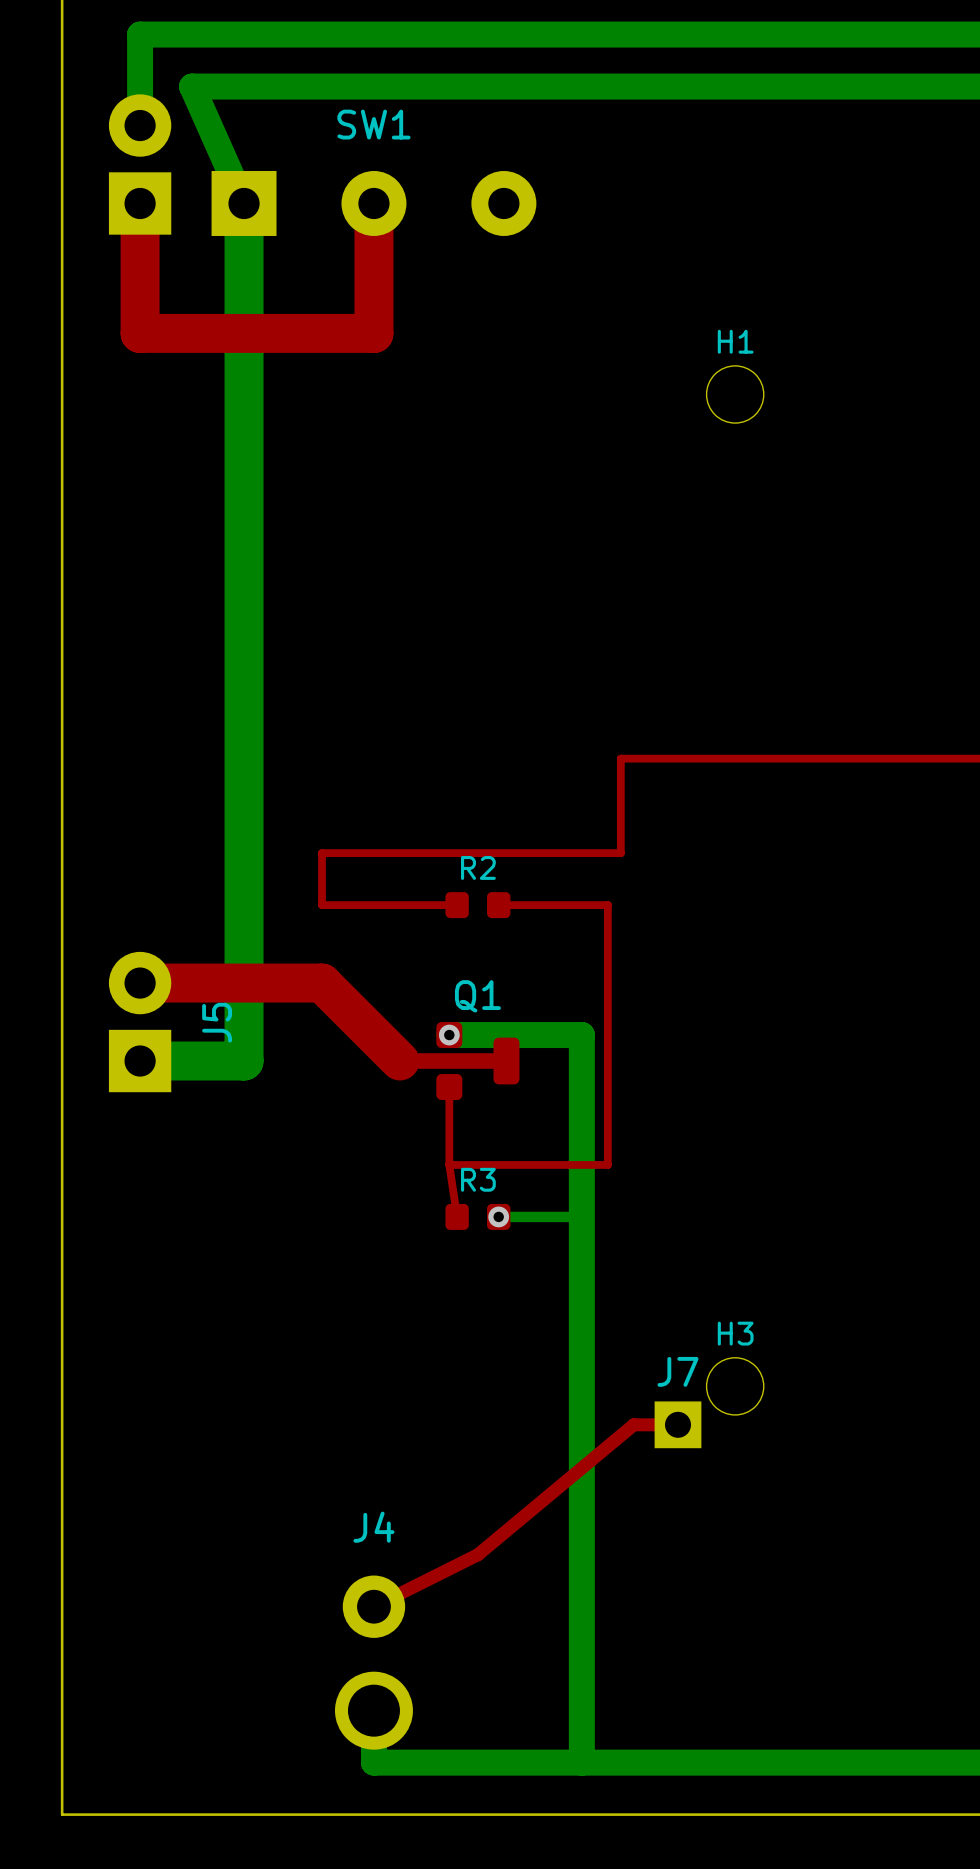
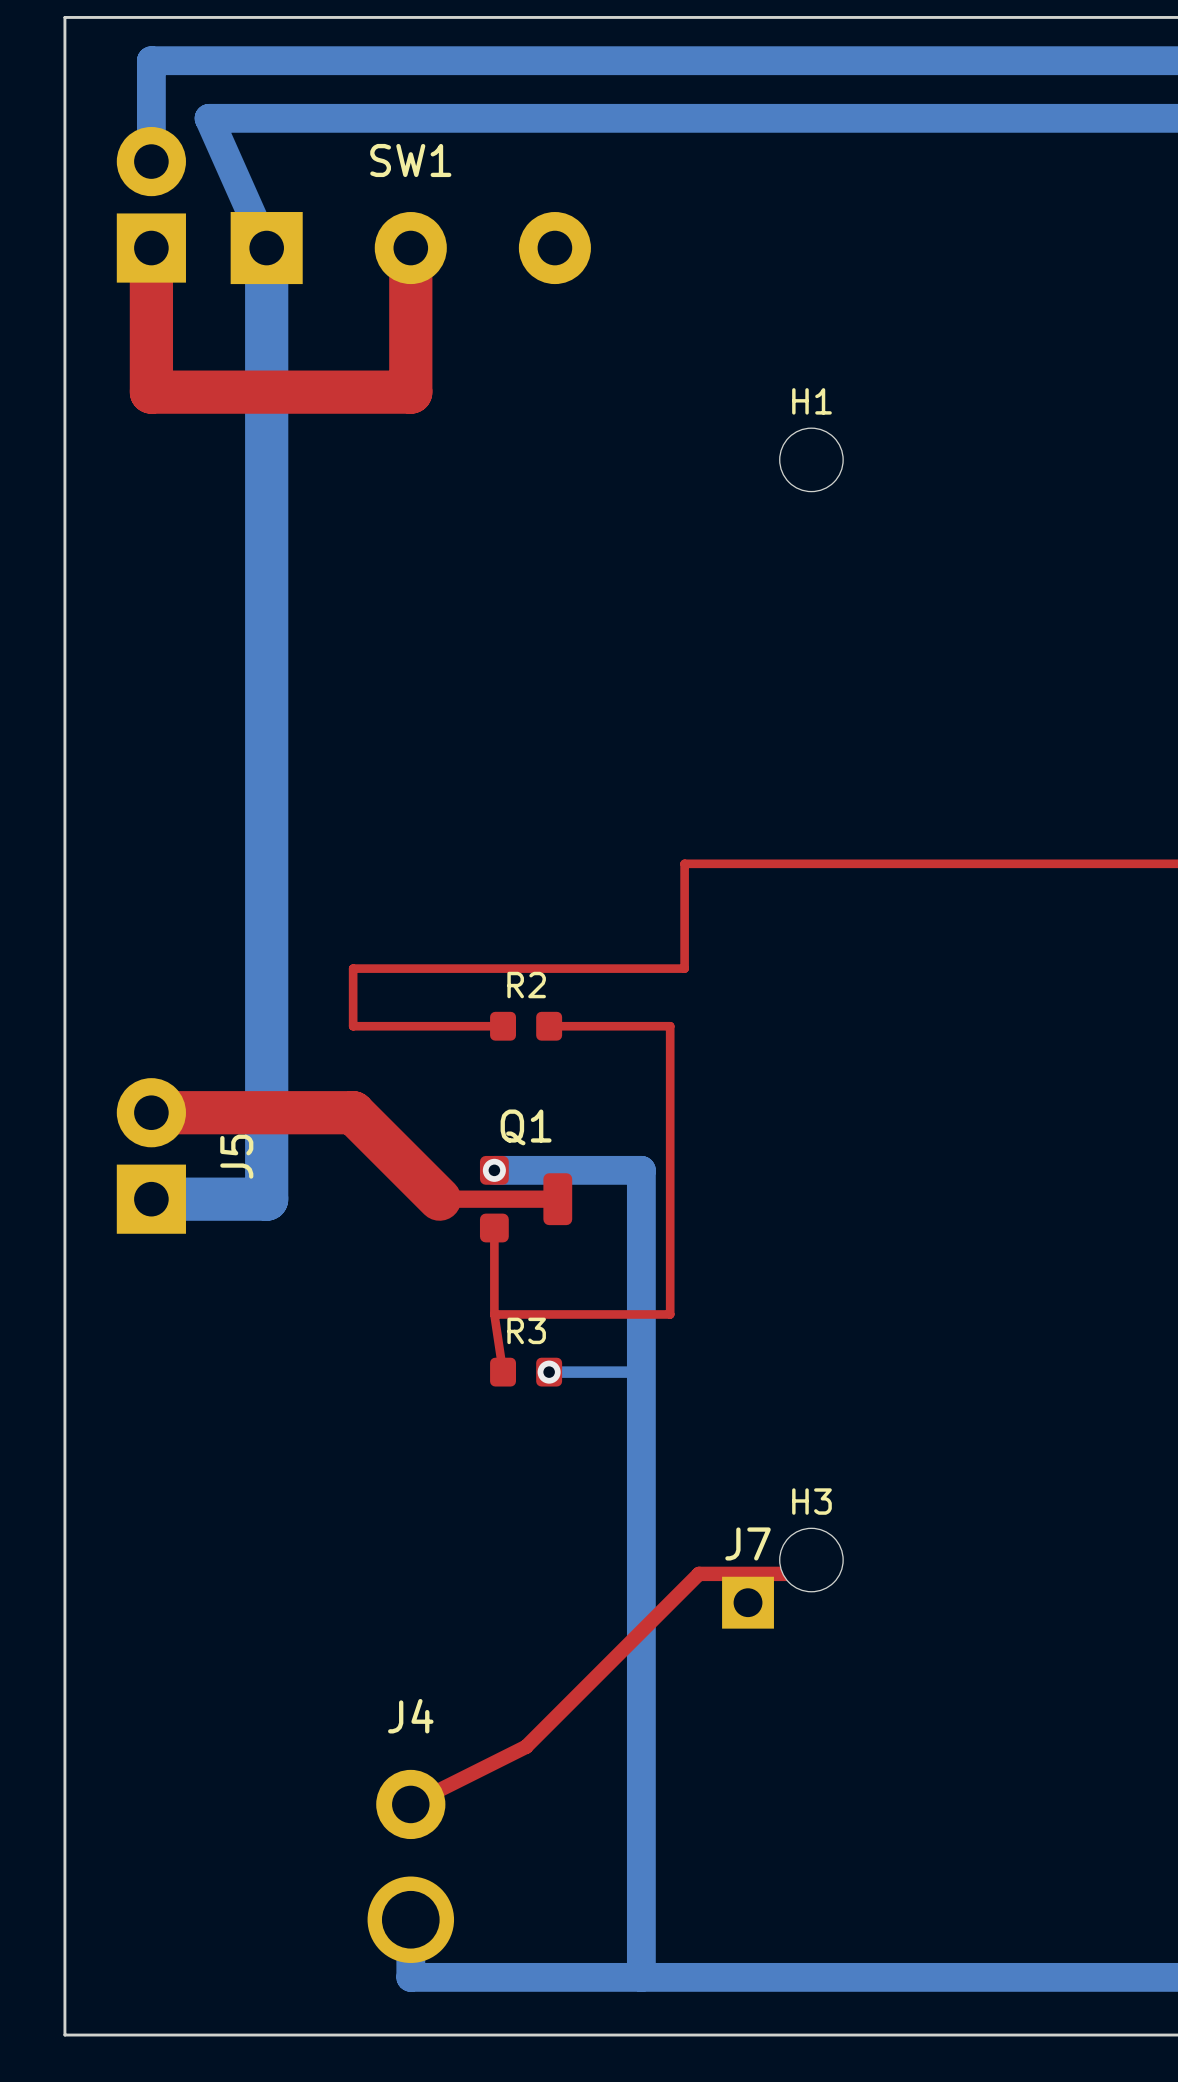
top track: (678, 1424) (633, 1424) (477, 1554) -> (803, 1573) (699, 1573) (526, 1746)

